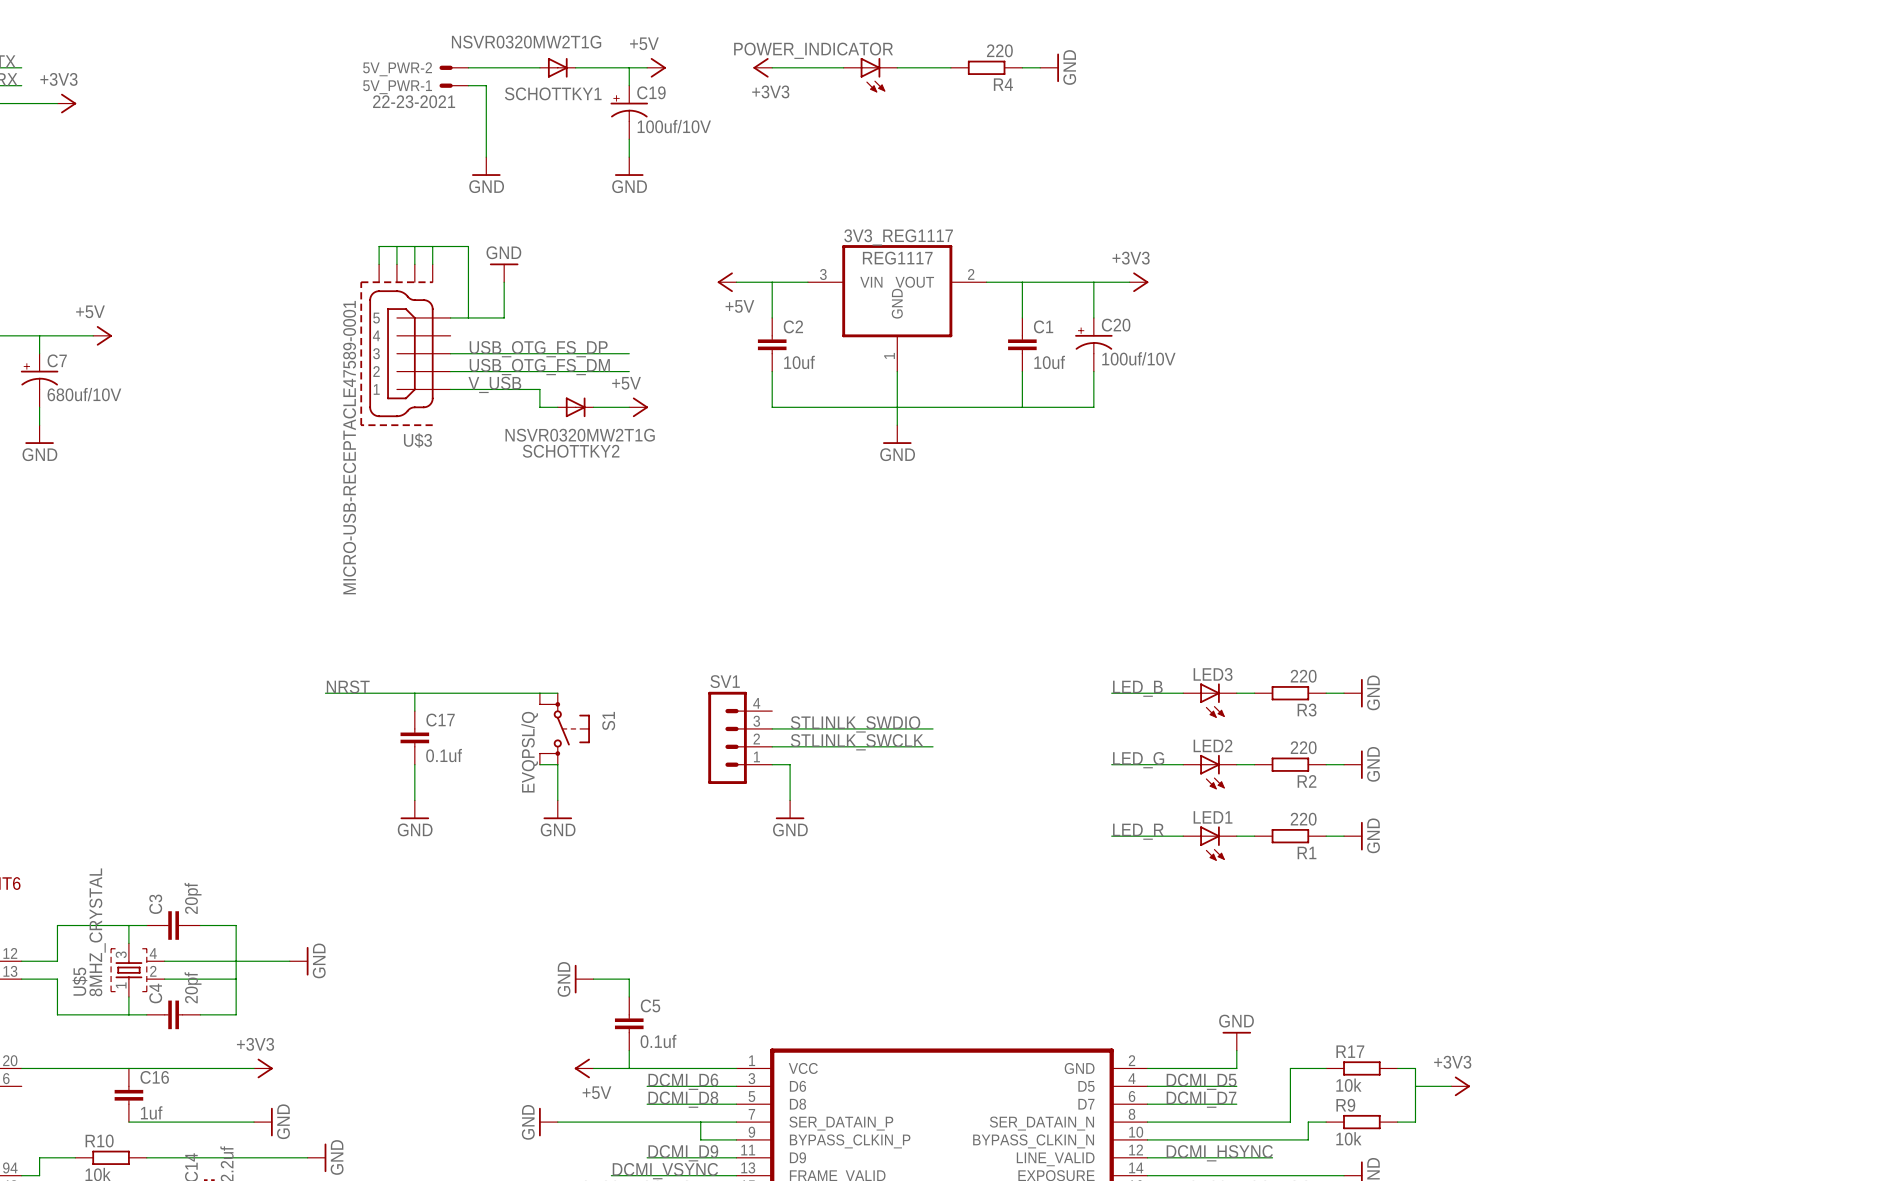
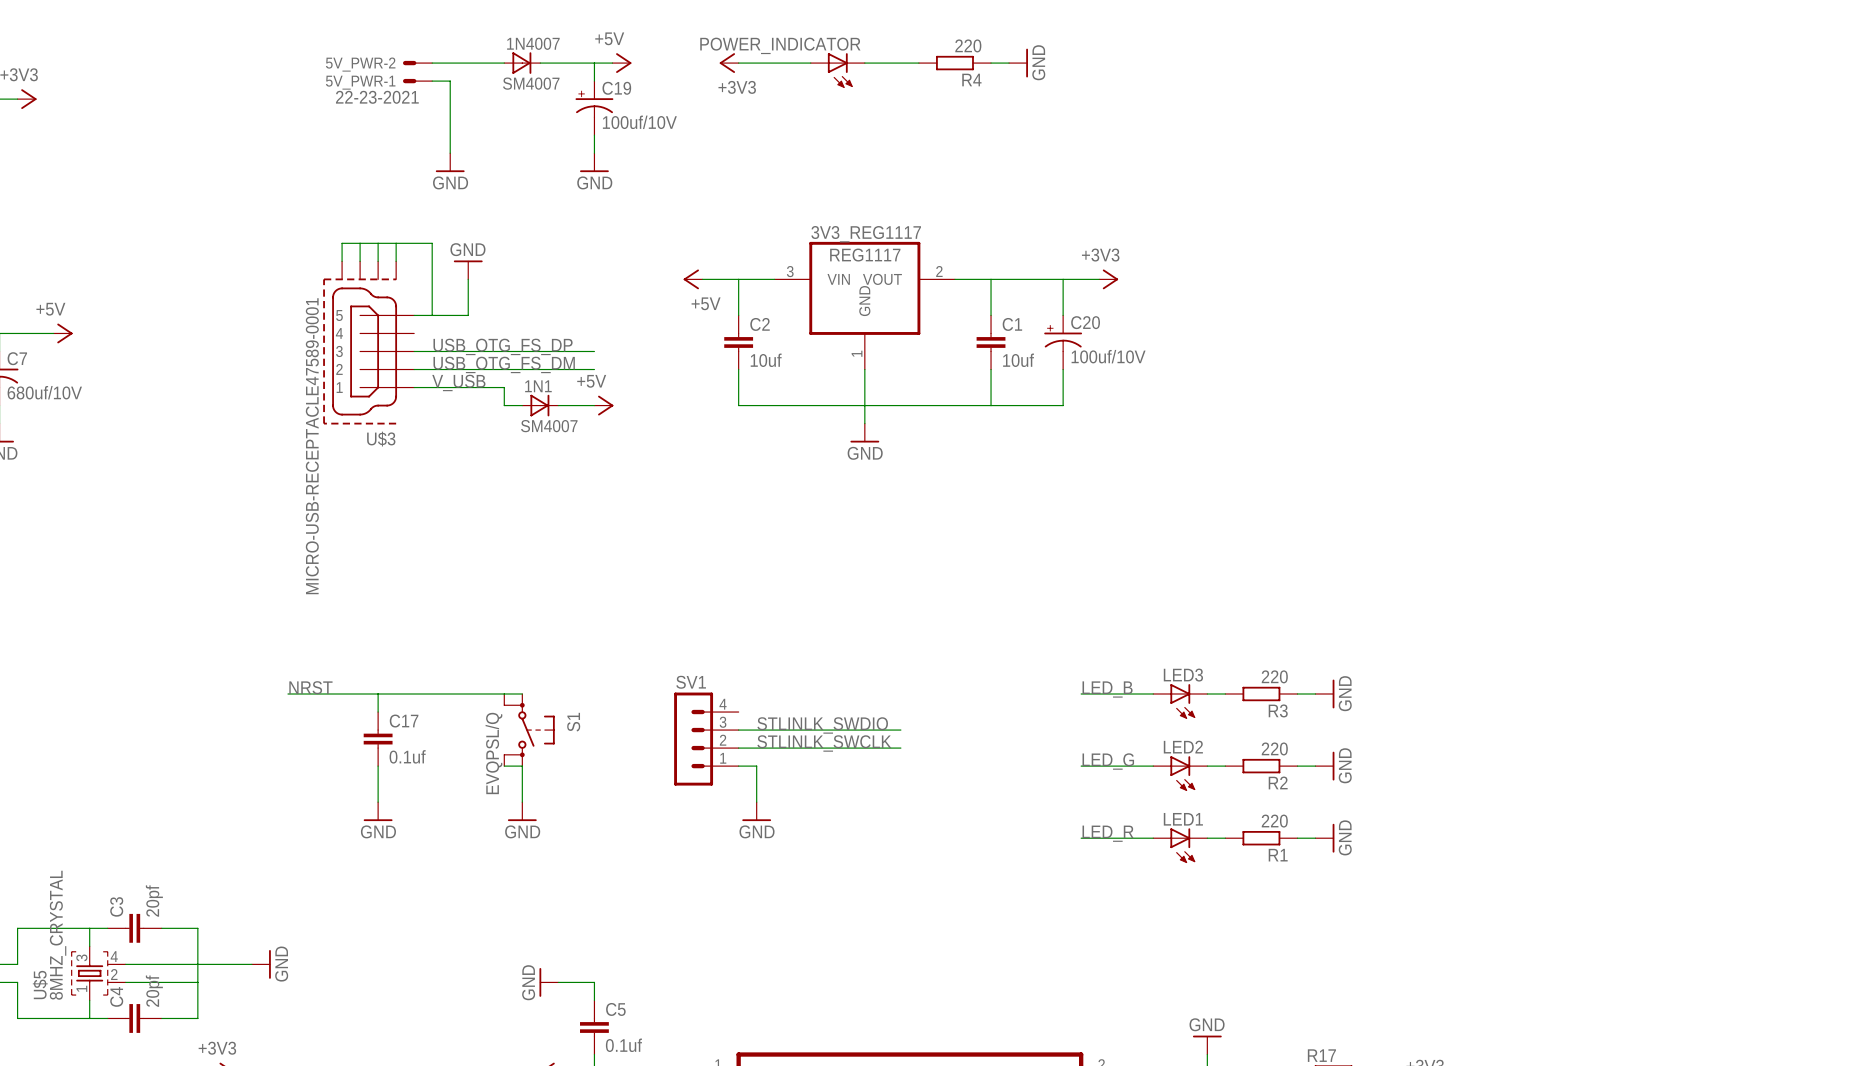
SCHOTTKY1: NSVR0320MW2T1G (557, 67) -> none
1N4007: none -> SM4007 (522, 63)
SCHOTTKY2: NSVR0320MW2T1G (575, 407) -> none
1N1: none -> SM4007 (540, 405)

